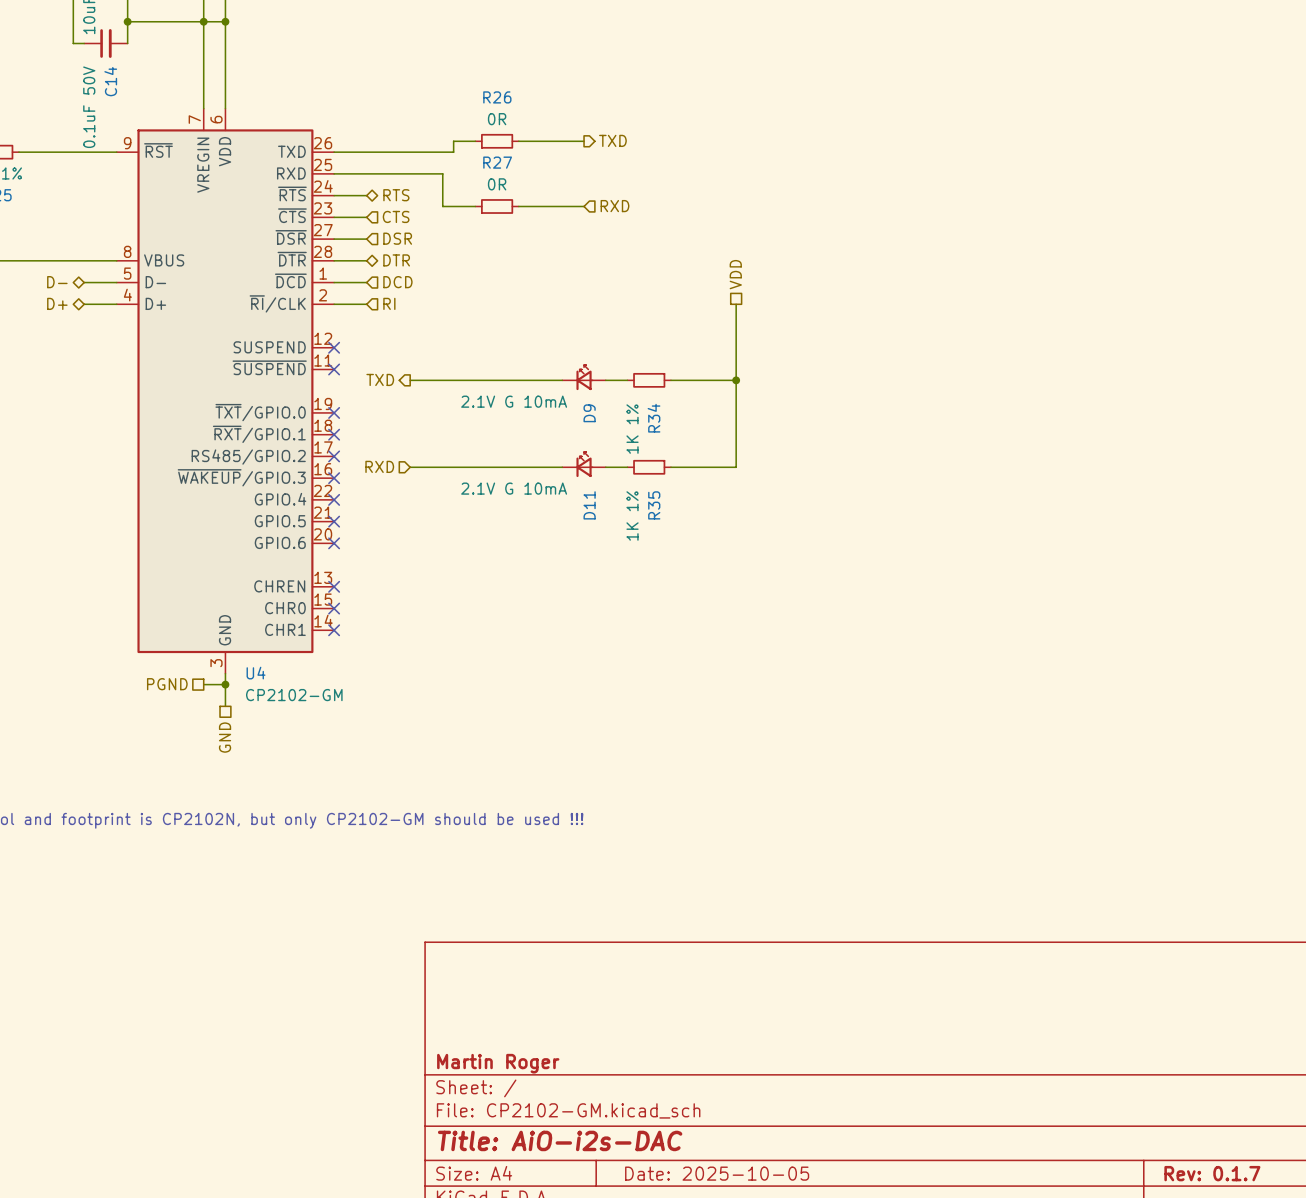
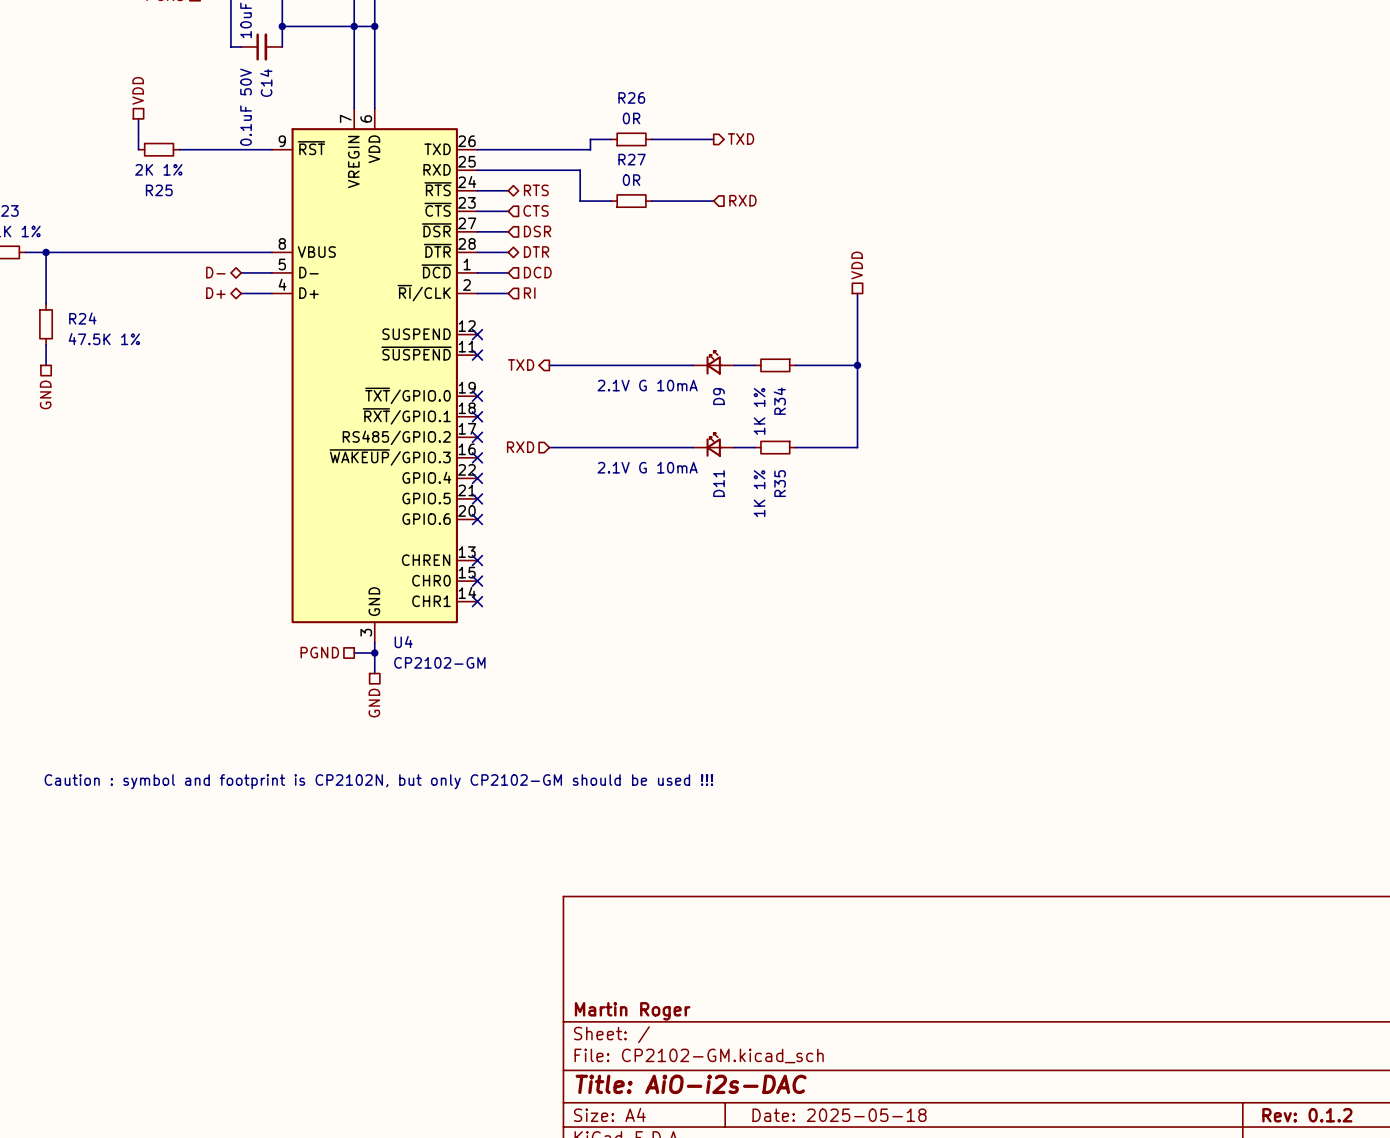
title block: Date: 2025-10-05 (717, 1173) -> Date: 2025-05-18 (839, 1115)
title block: Rev: 0.1.7 (1212, 1173) -> Rev: 0.1.2 (1307, 1115)

